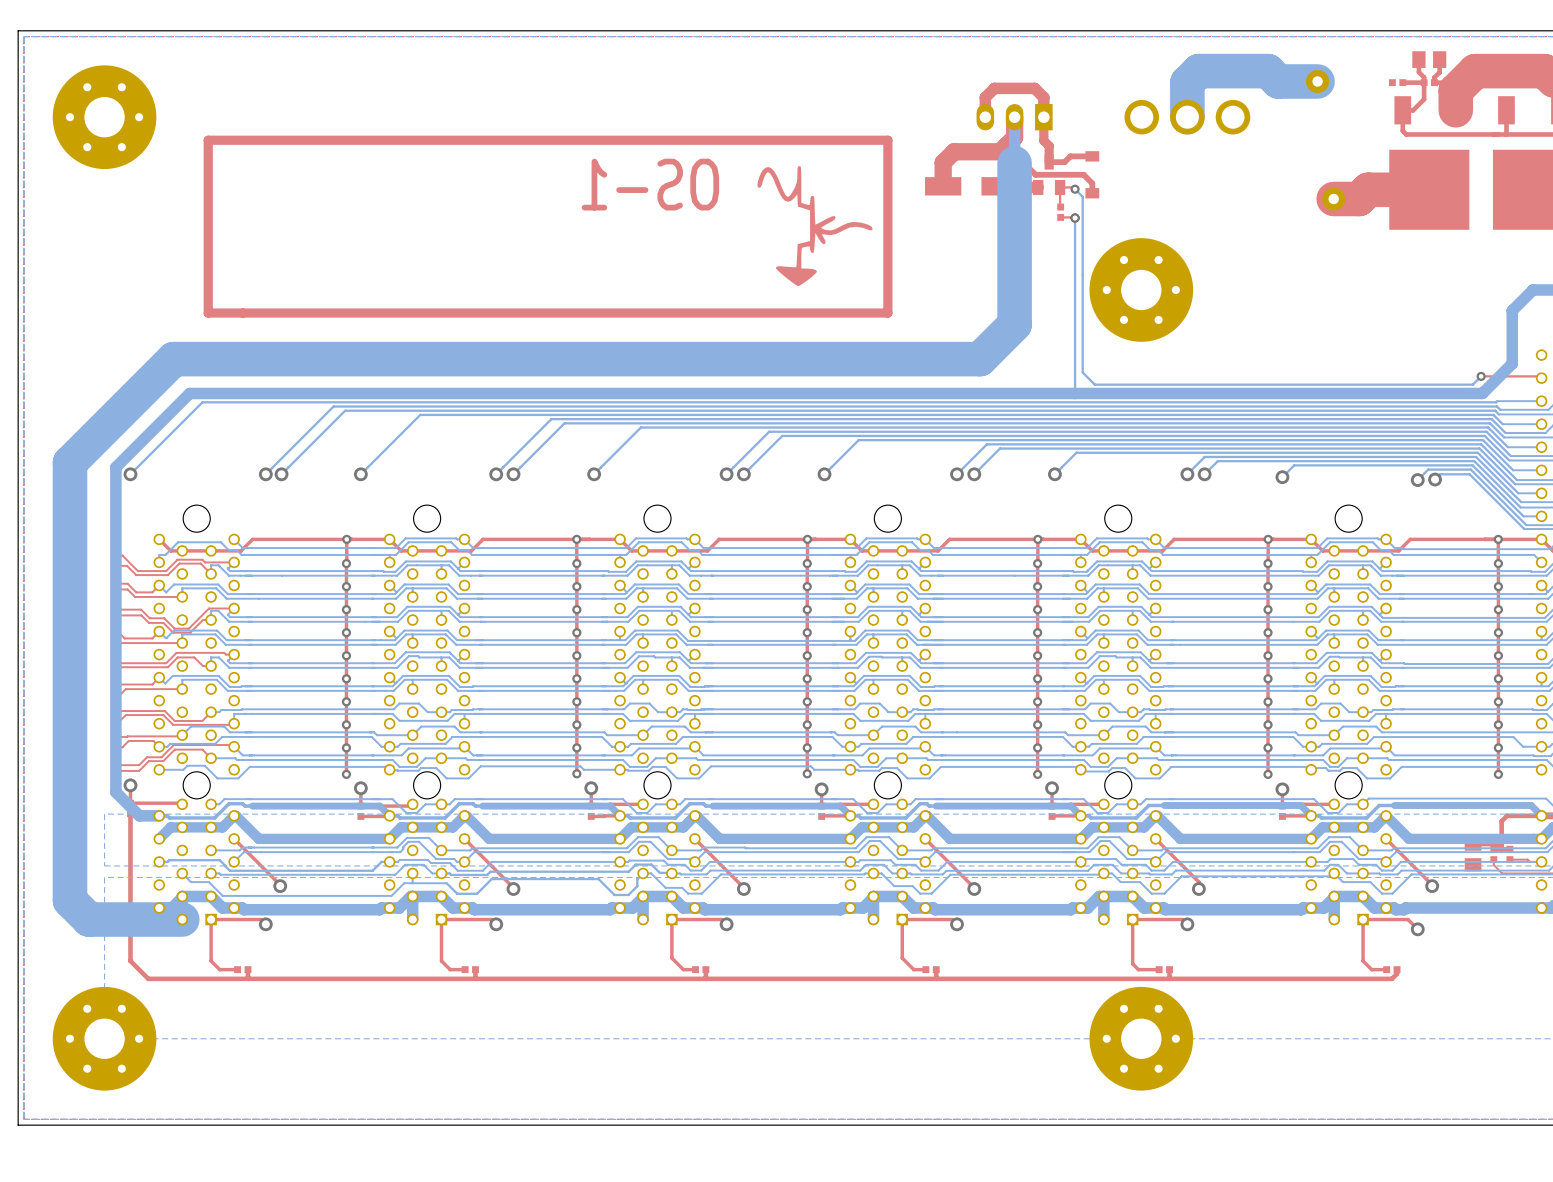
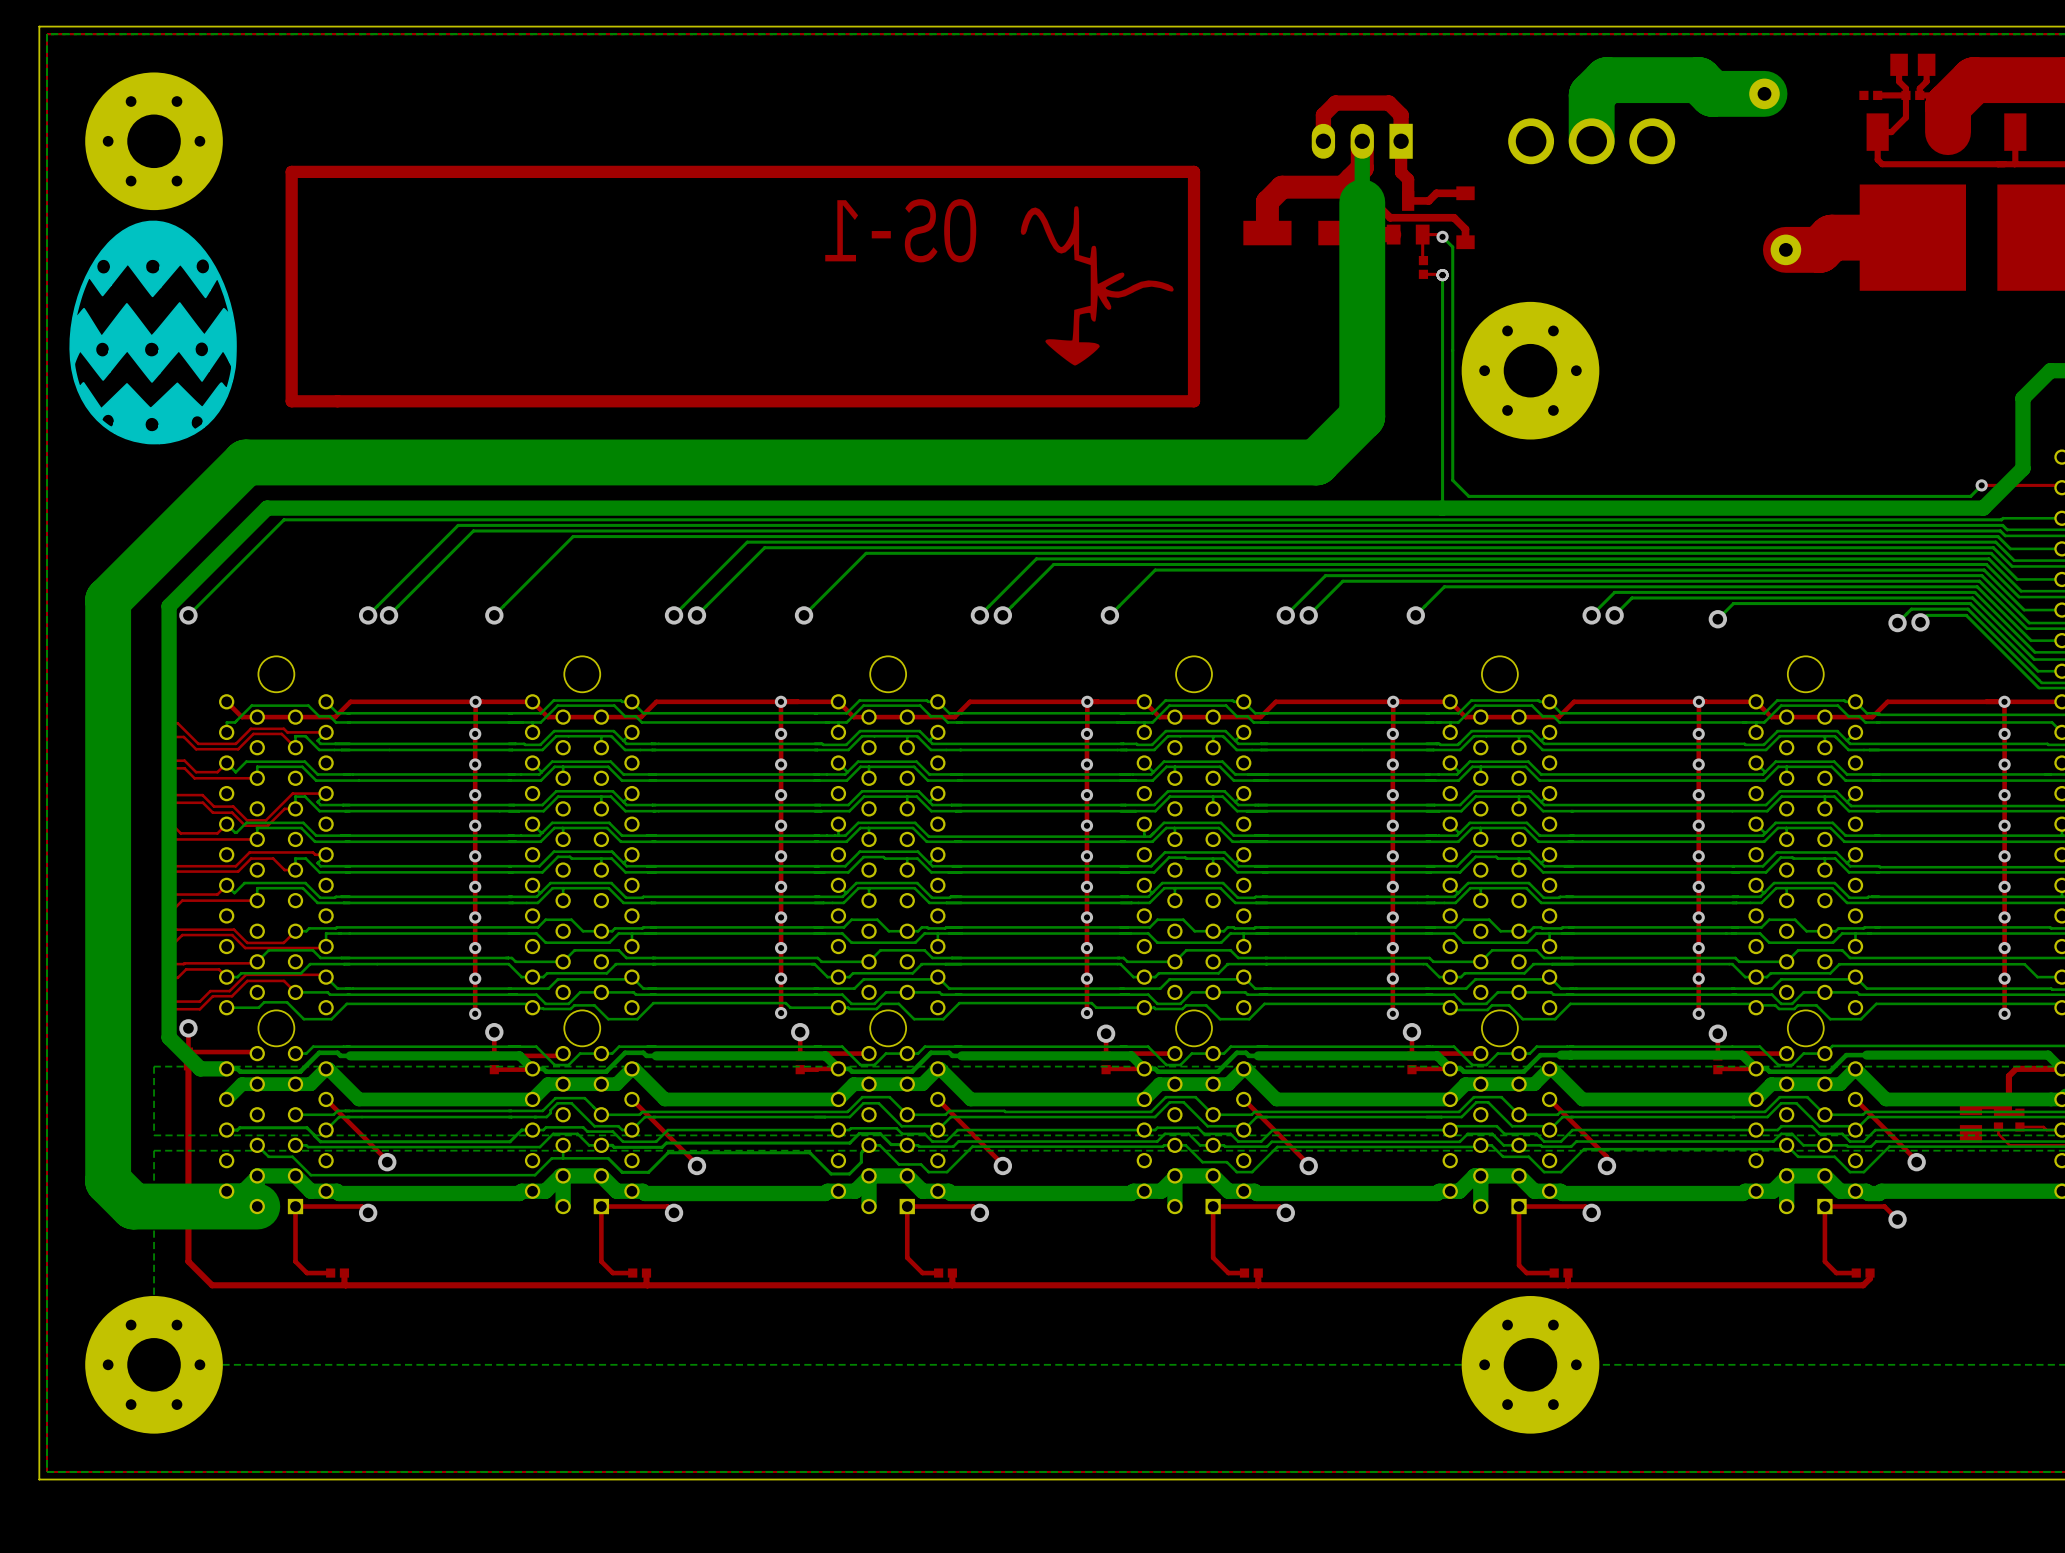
drawing: none -> [69, 220, 237, 445]

